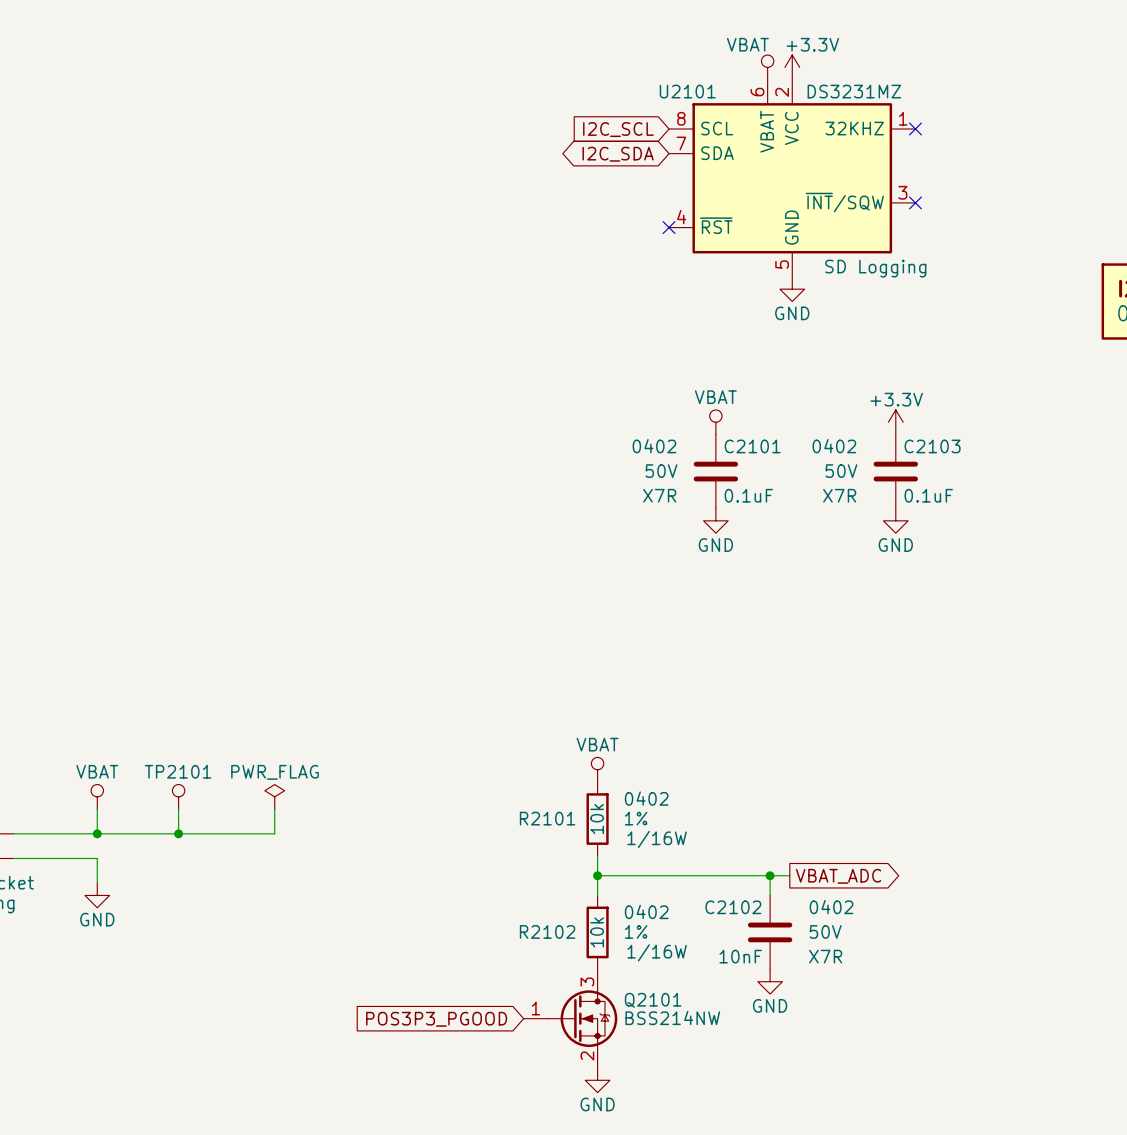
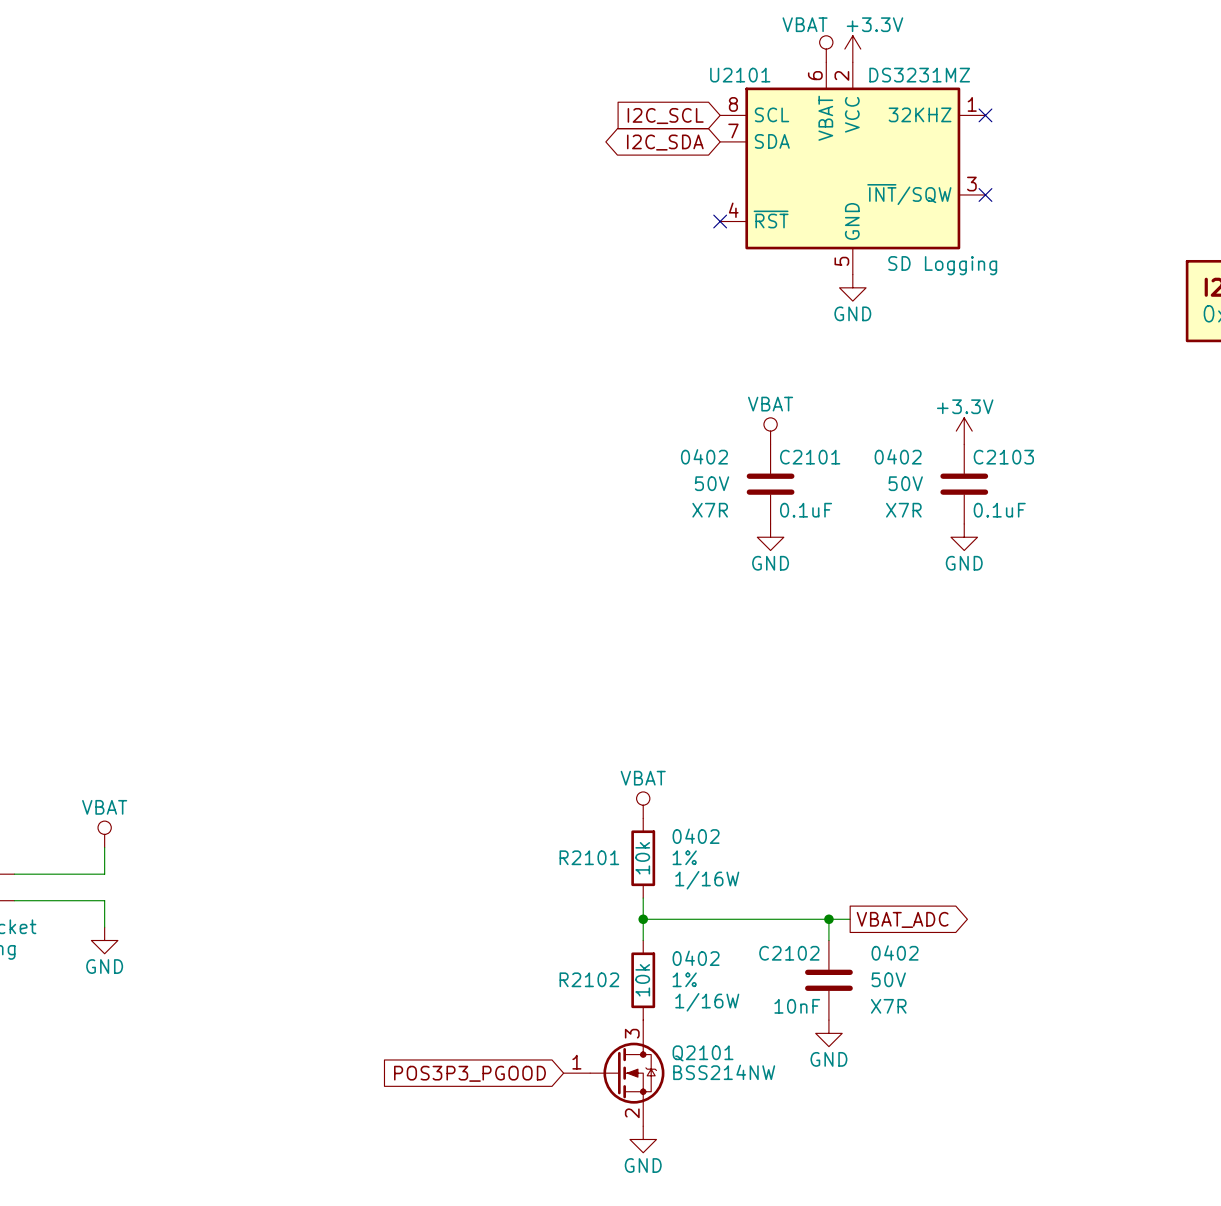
TP2101: (178, 796) -> none
power symbol: PWR_FLAG (274, 796) -> none
wire: (178, 809) (178, 833) -> none
wire: (274, 809) (274, 833) (97, 833) -> none
junction: (97, 833) -> none
junction: (178, 833) -> none

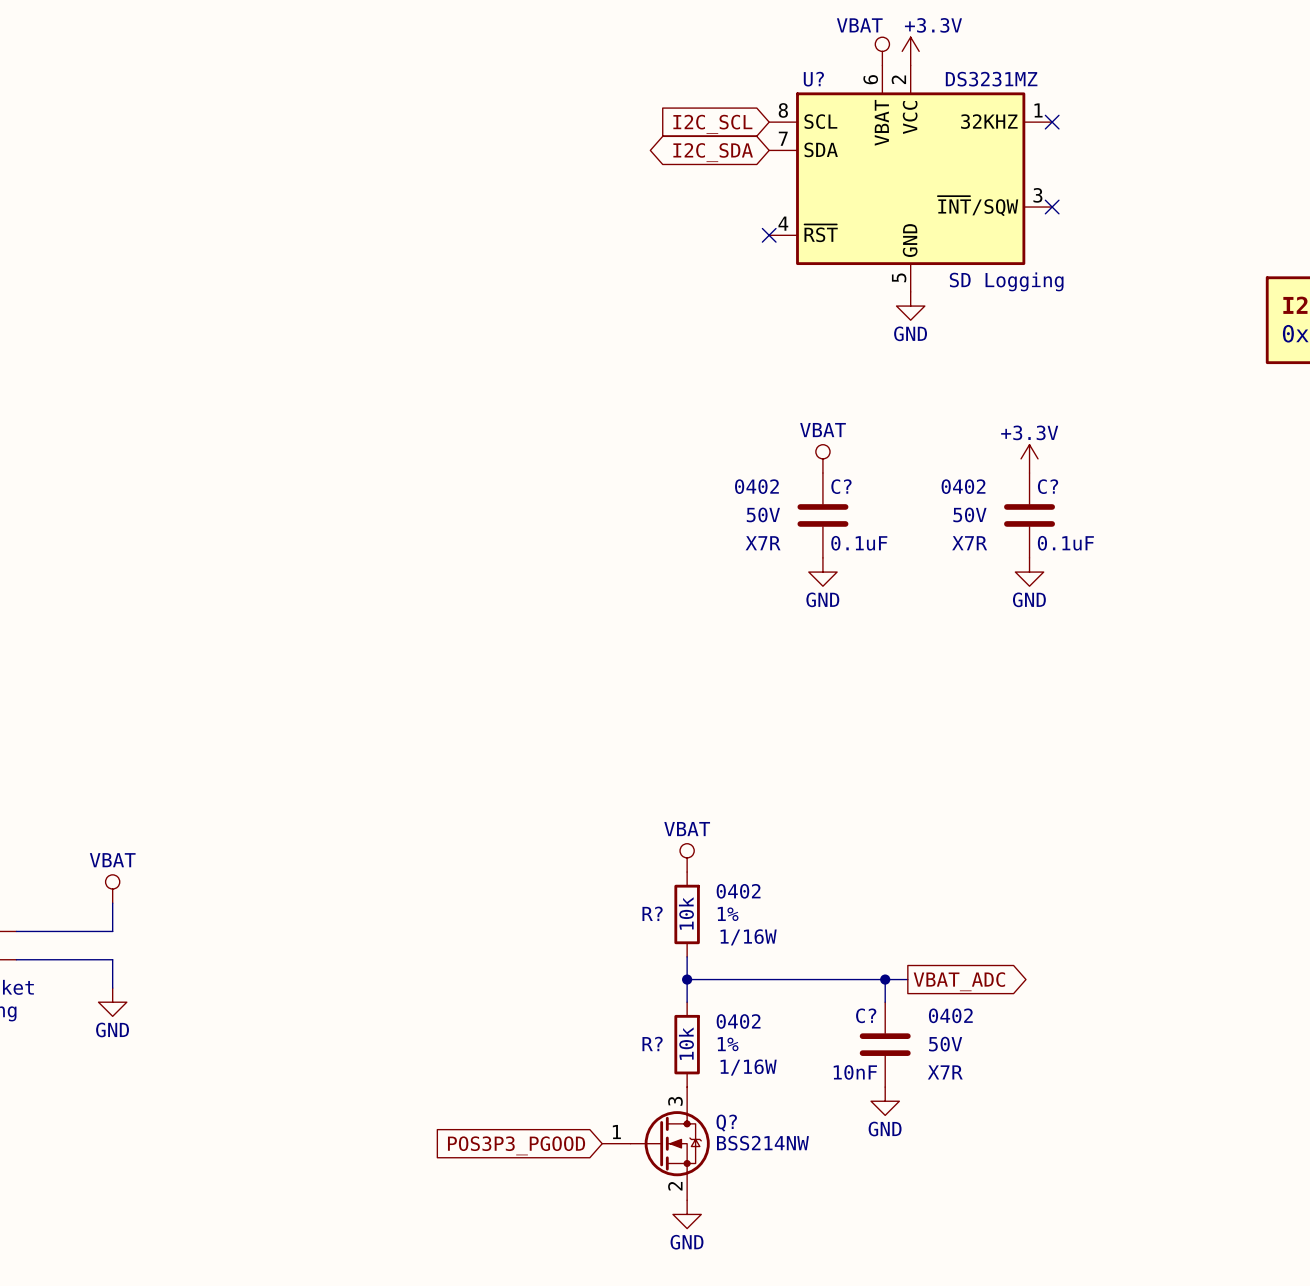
U2101 name: U2101 (740, 75) -> U? (813, 79)
C2101 name: C2101 (810, 457) -> C? (841, 486)
C2103 name: C2103 (1003, 457) -> C? (1048, 486)
R2101 name: R2101 (589, 857) -> R? (652, 913)
C2102 name: C2102 (789, 953) -> C? (866, 1015)
R2102 name: R2102 (589, 979) -> R? (652, 1043)
Q2101 name: Q2101 (703, 1053) -> Q? (726, 1123)

